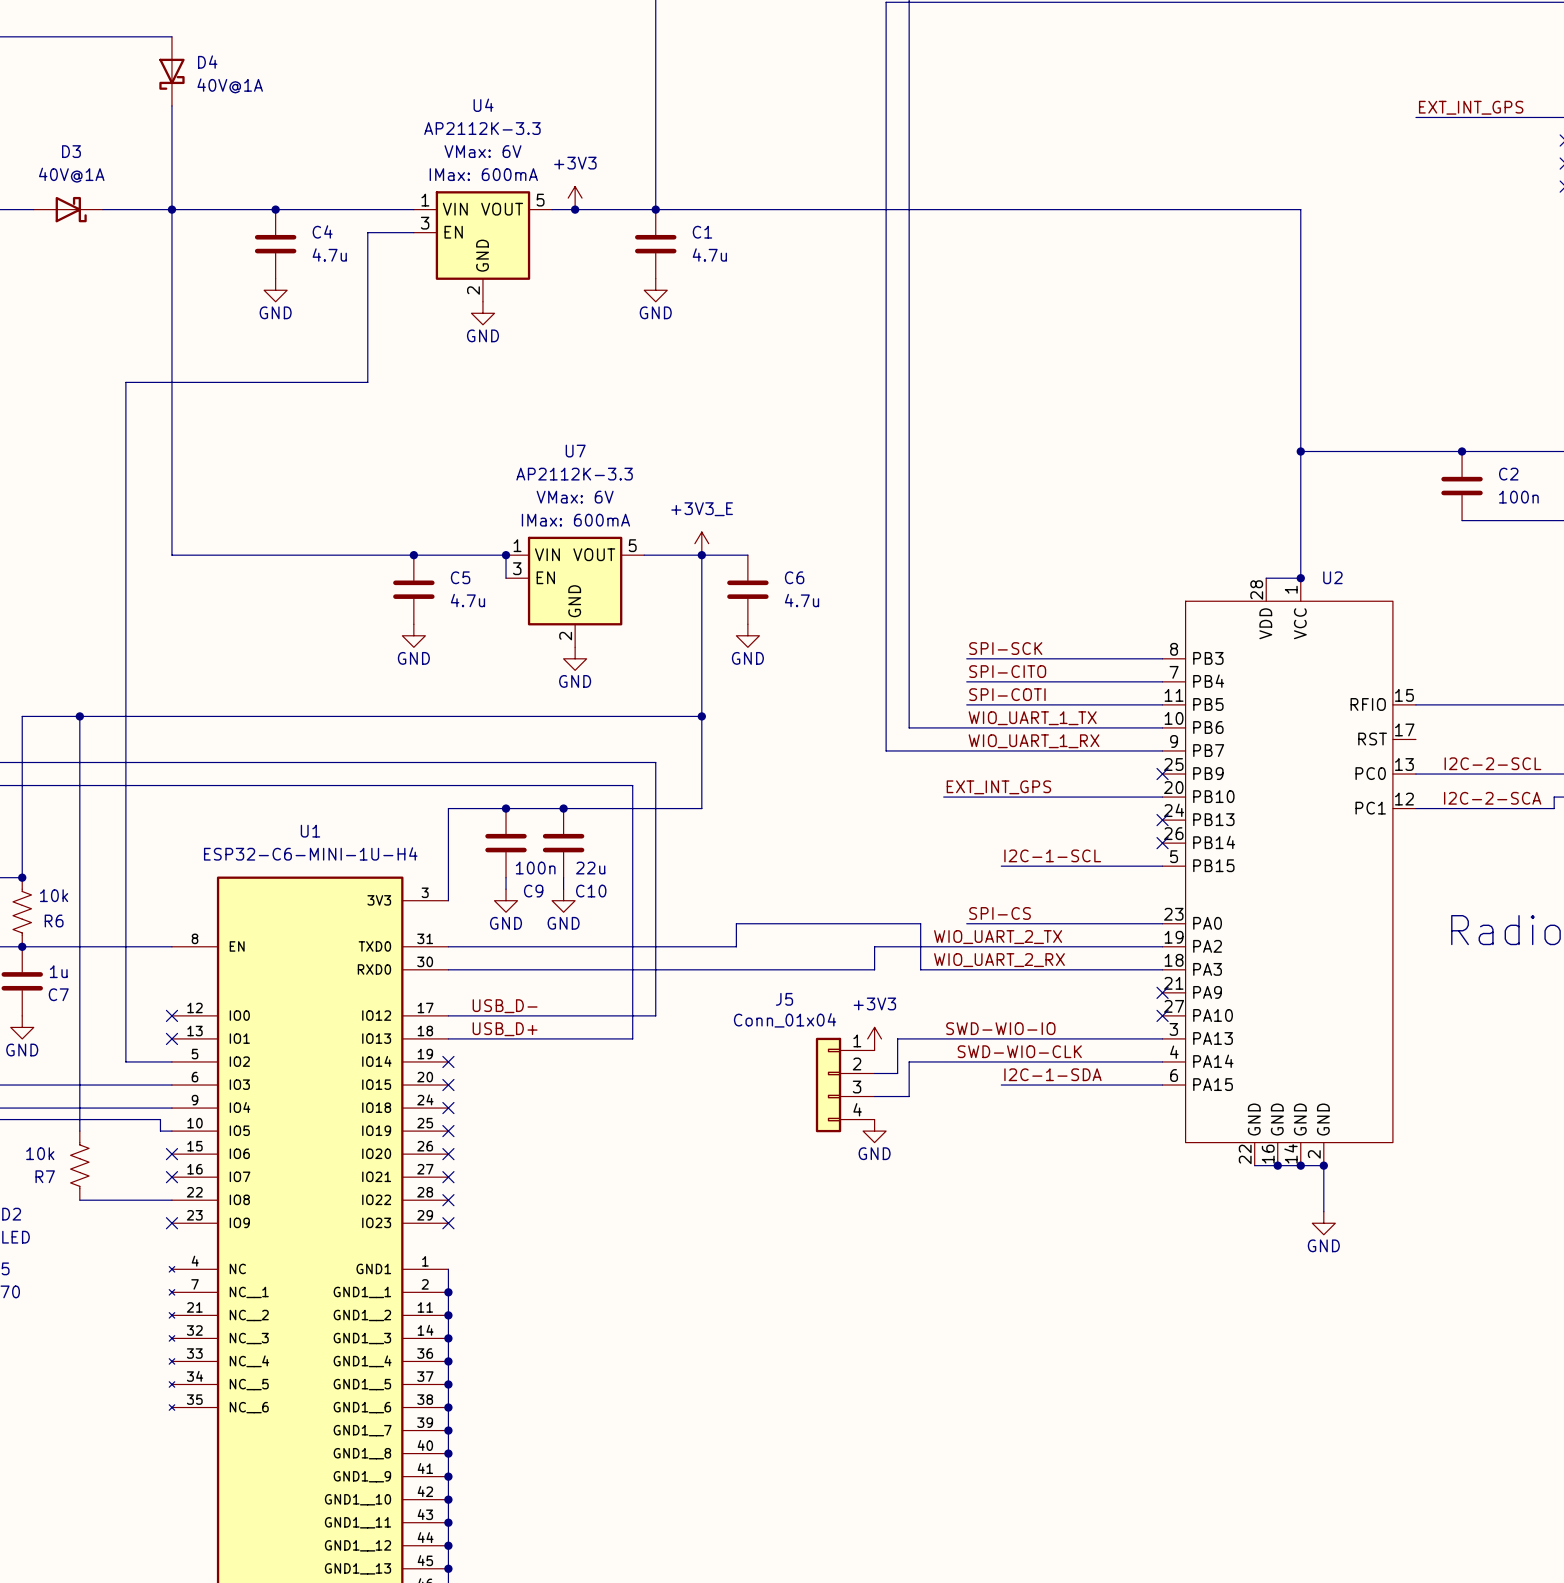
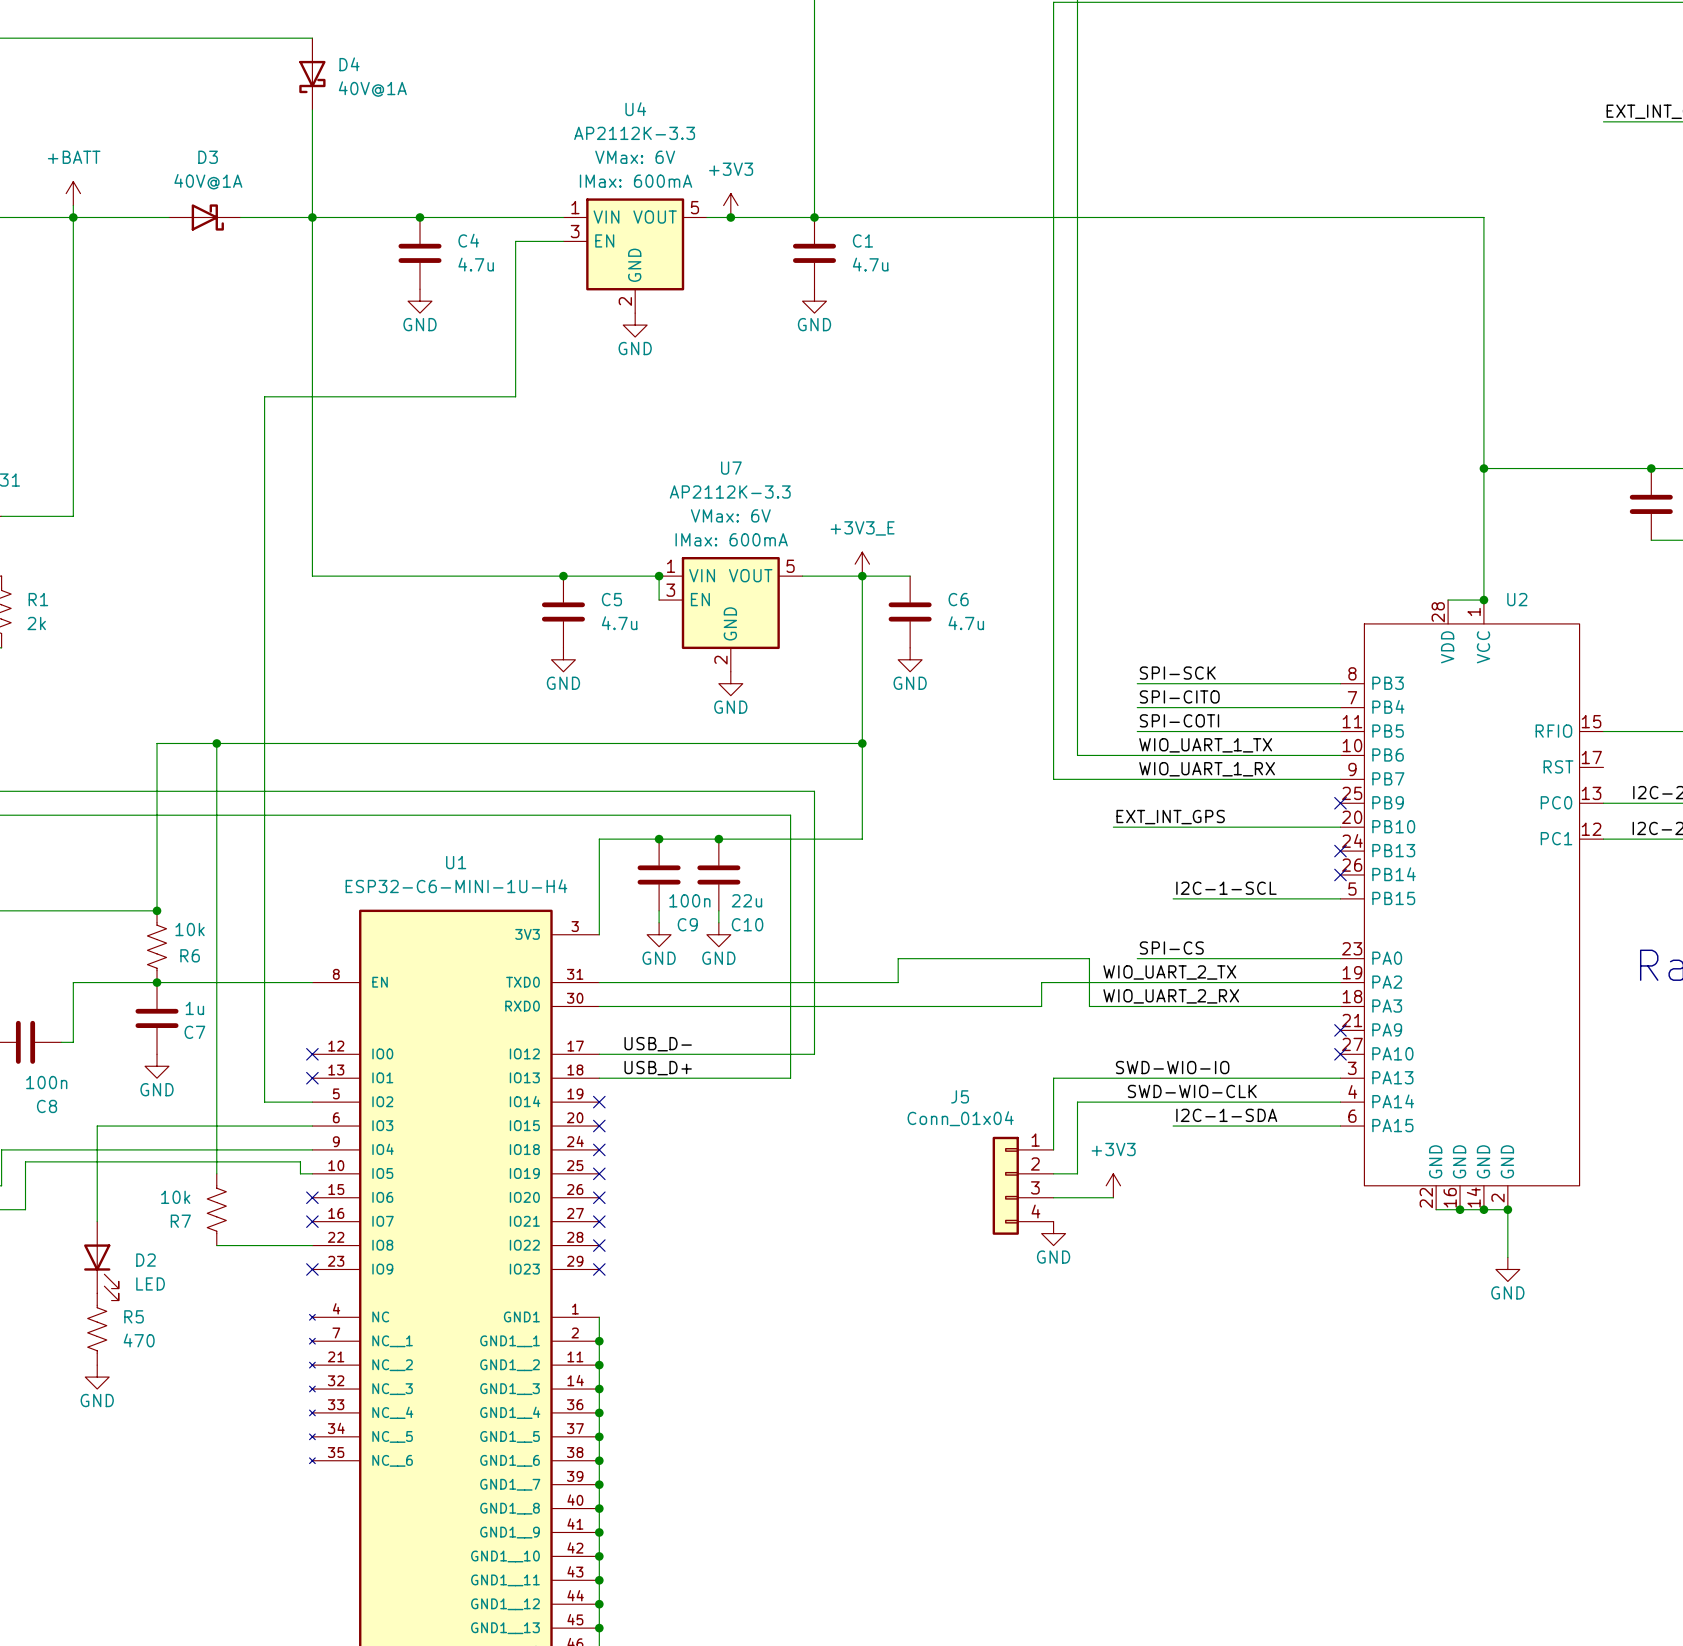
power symbol position: +3V3 (874, 1038) -> +3V3 (1113, 1185)
wire: (897, 1038) (897, 1073) (874, 1073) -> (1065, 1078) (1053, 1078) (1053, 1149)
J5 position: (845, 1085) -> (1023, 1185)
wire: (874, 1096) (909, 1096) -> (1053, 1173) (1077, 1173) (1077, 1137)
power symbol position: GND (874, 1131) -> GND (1053, 1233)
wire: none -> (1053, 1197) (1113, 1197)

